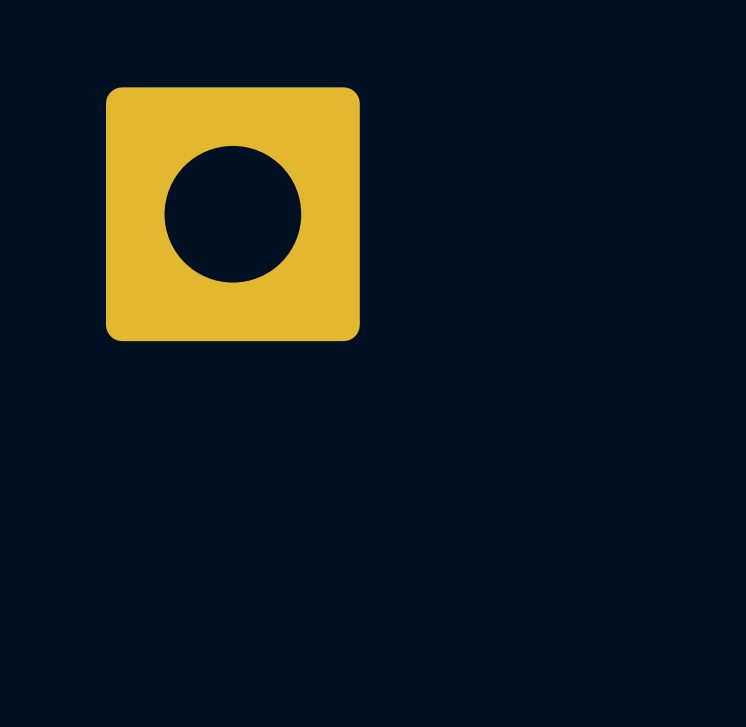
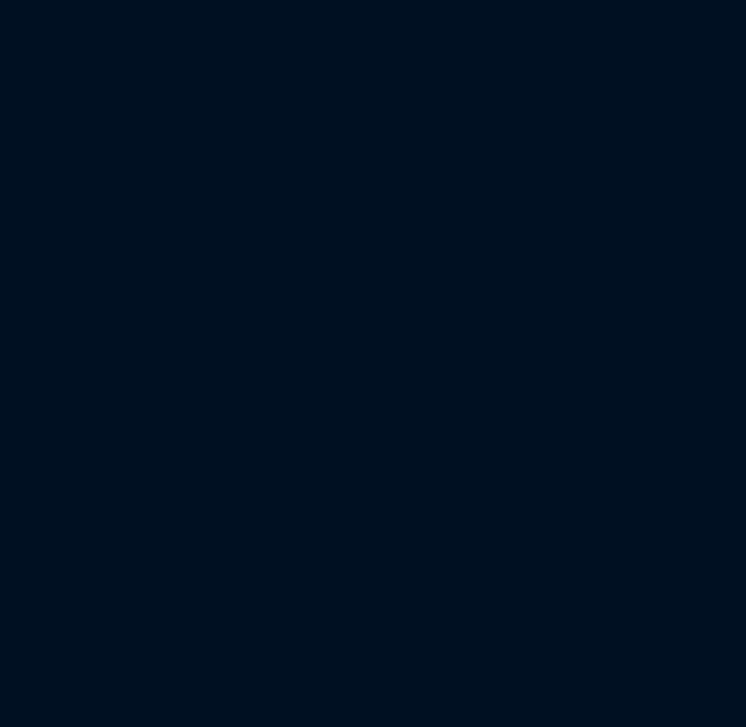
part: (232, 214) -> none

